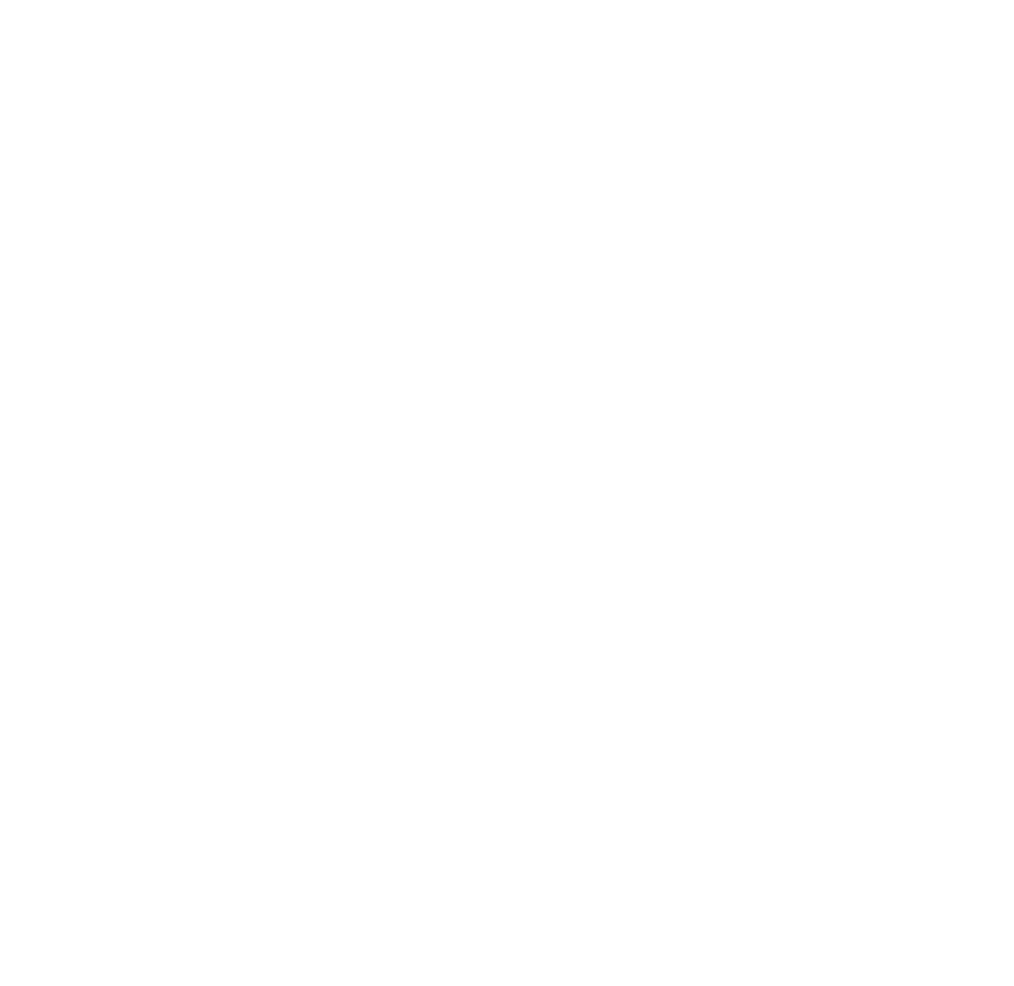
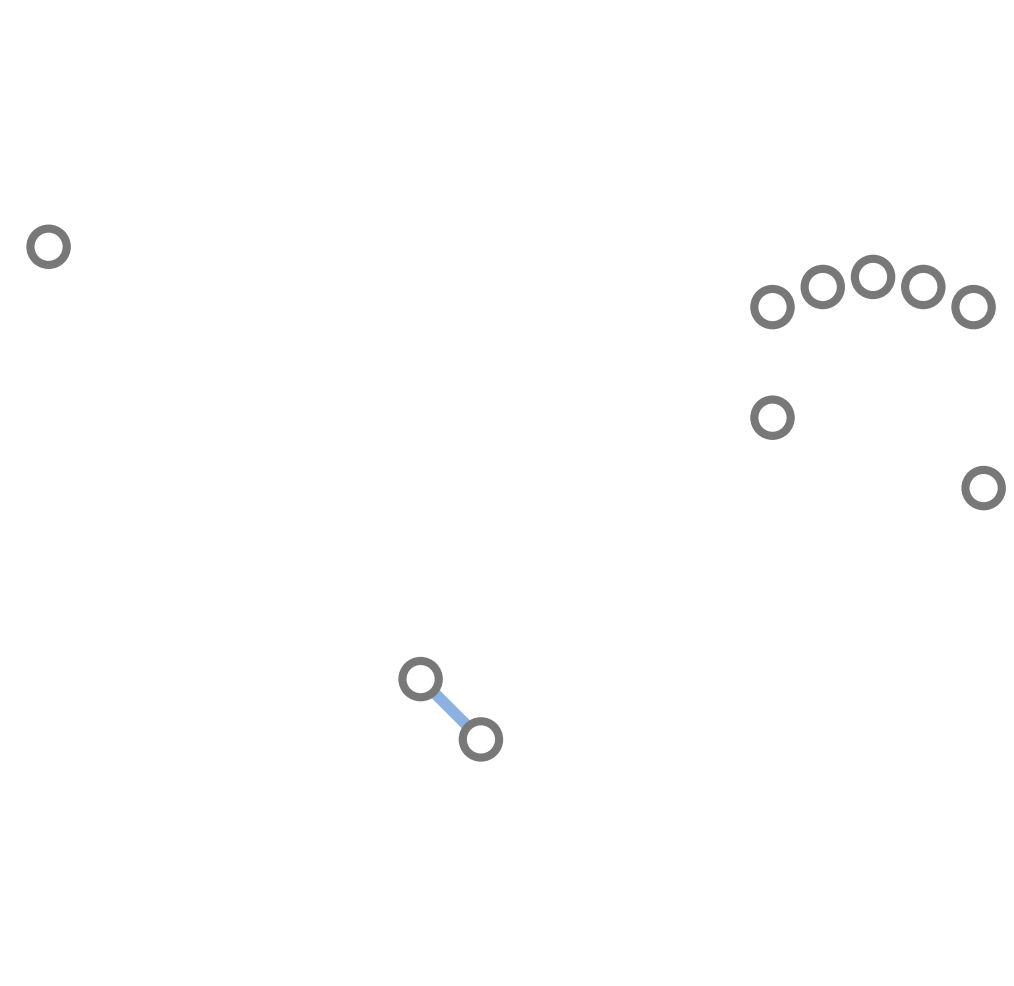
via: none -> (48, 246)
via: none -> (873, 276)
via: none -> (822, 286)
via: none -> (923, 286)
via: none -> (772, 307)
via: none -> (973, 307)
via: none -> (772, 417)
via: none -> (983, 488)
track: none -> (420, 679) (480, 739)
via: none -> (420, 679)
via: none -> (480, 739)

